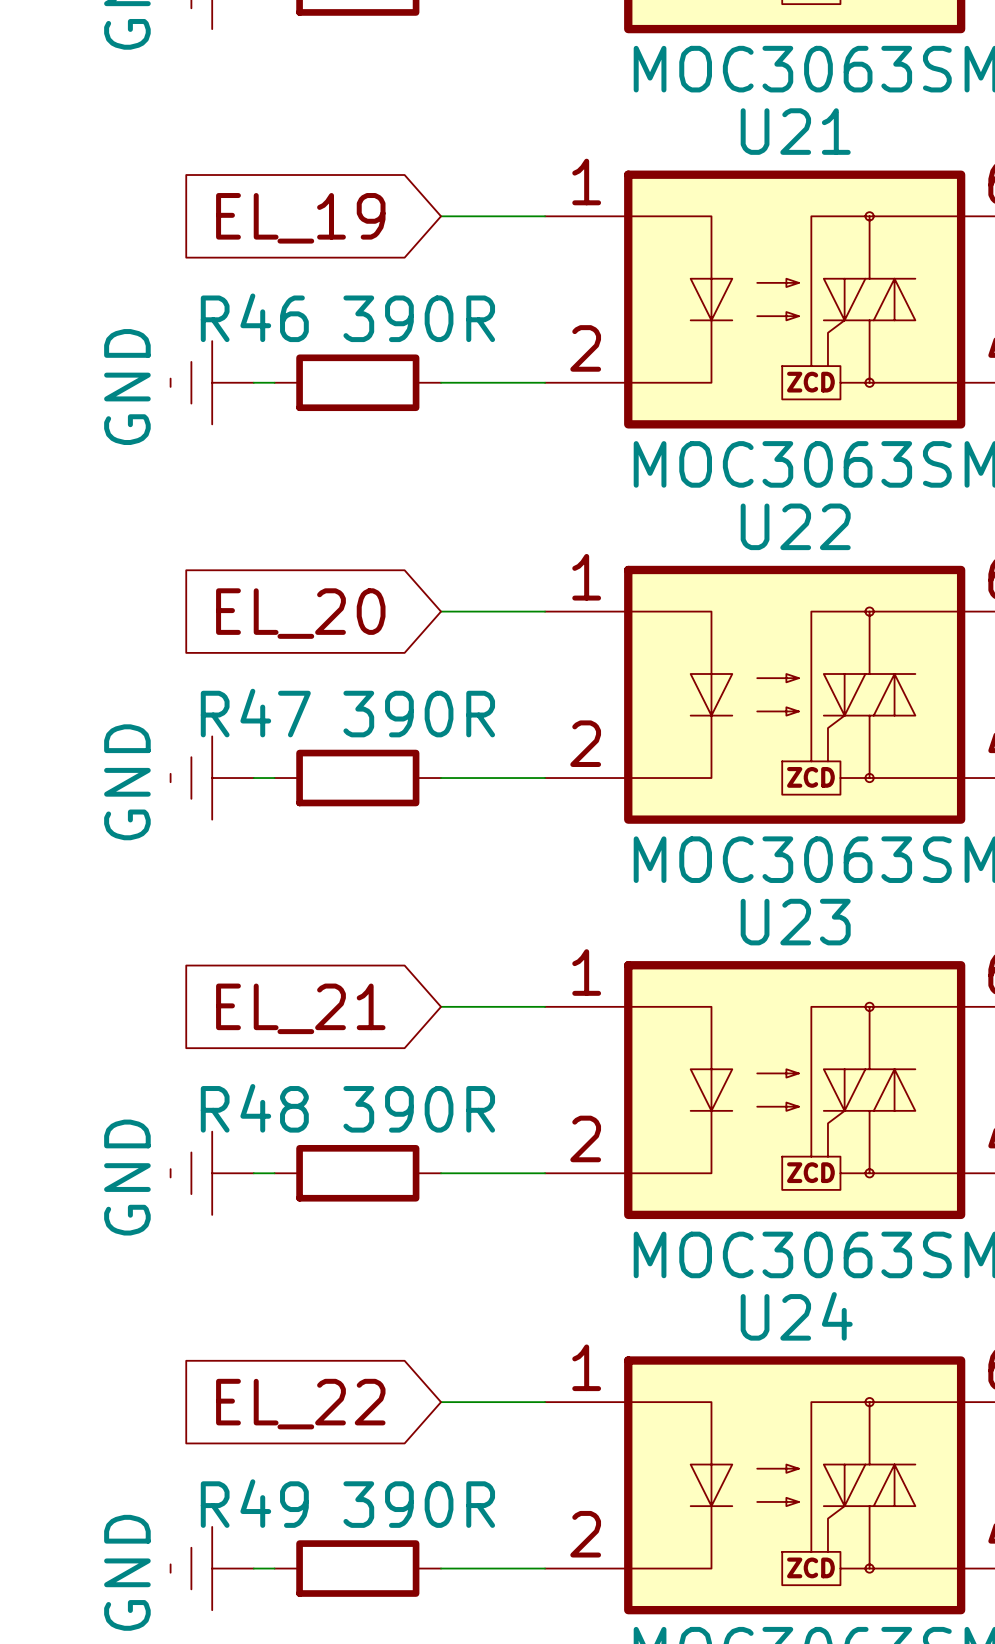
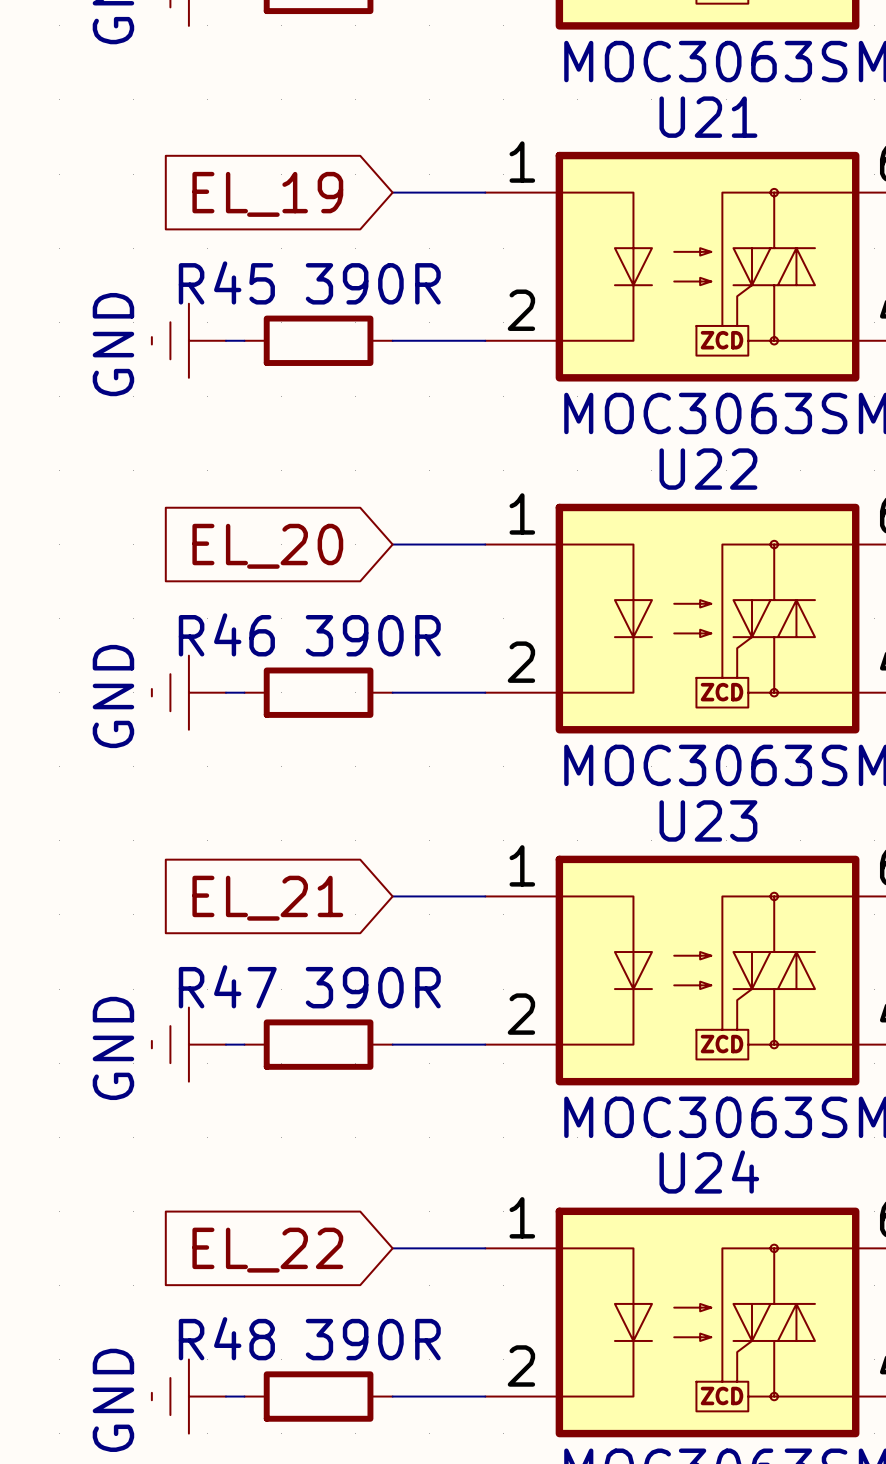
R46 name: R46 (254, 317) -> R45 (226, 282)
R47 name: R47 (255, 713) -> R46 (226, 634)
R48 name: R48 (254, 1108) -> R47 (227, 986)
R49 name: R49 (254, 1503) -> R48 (226, 1338)

